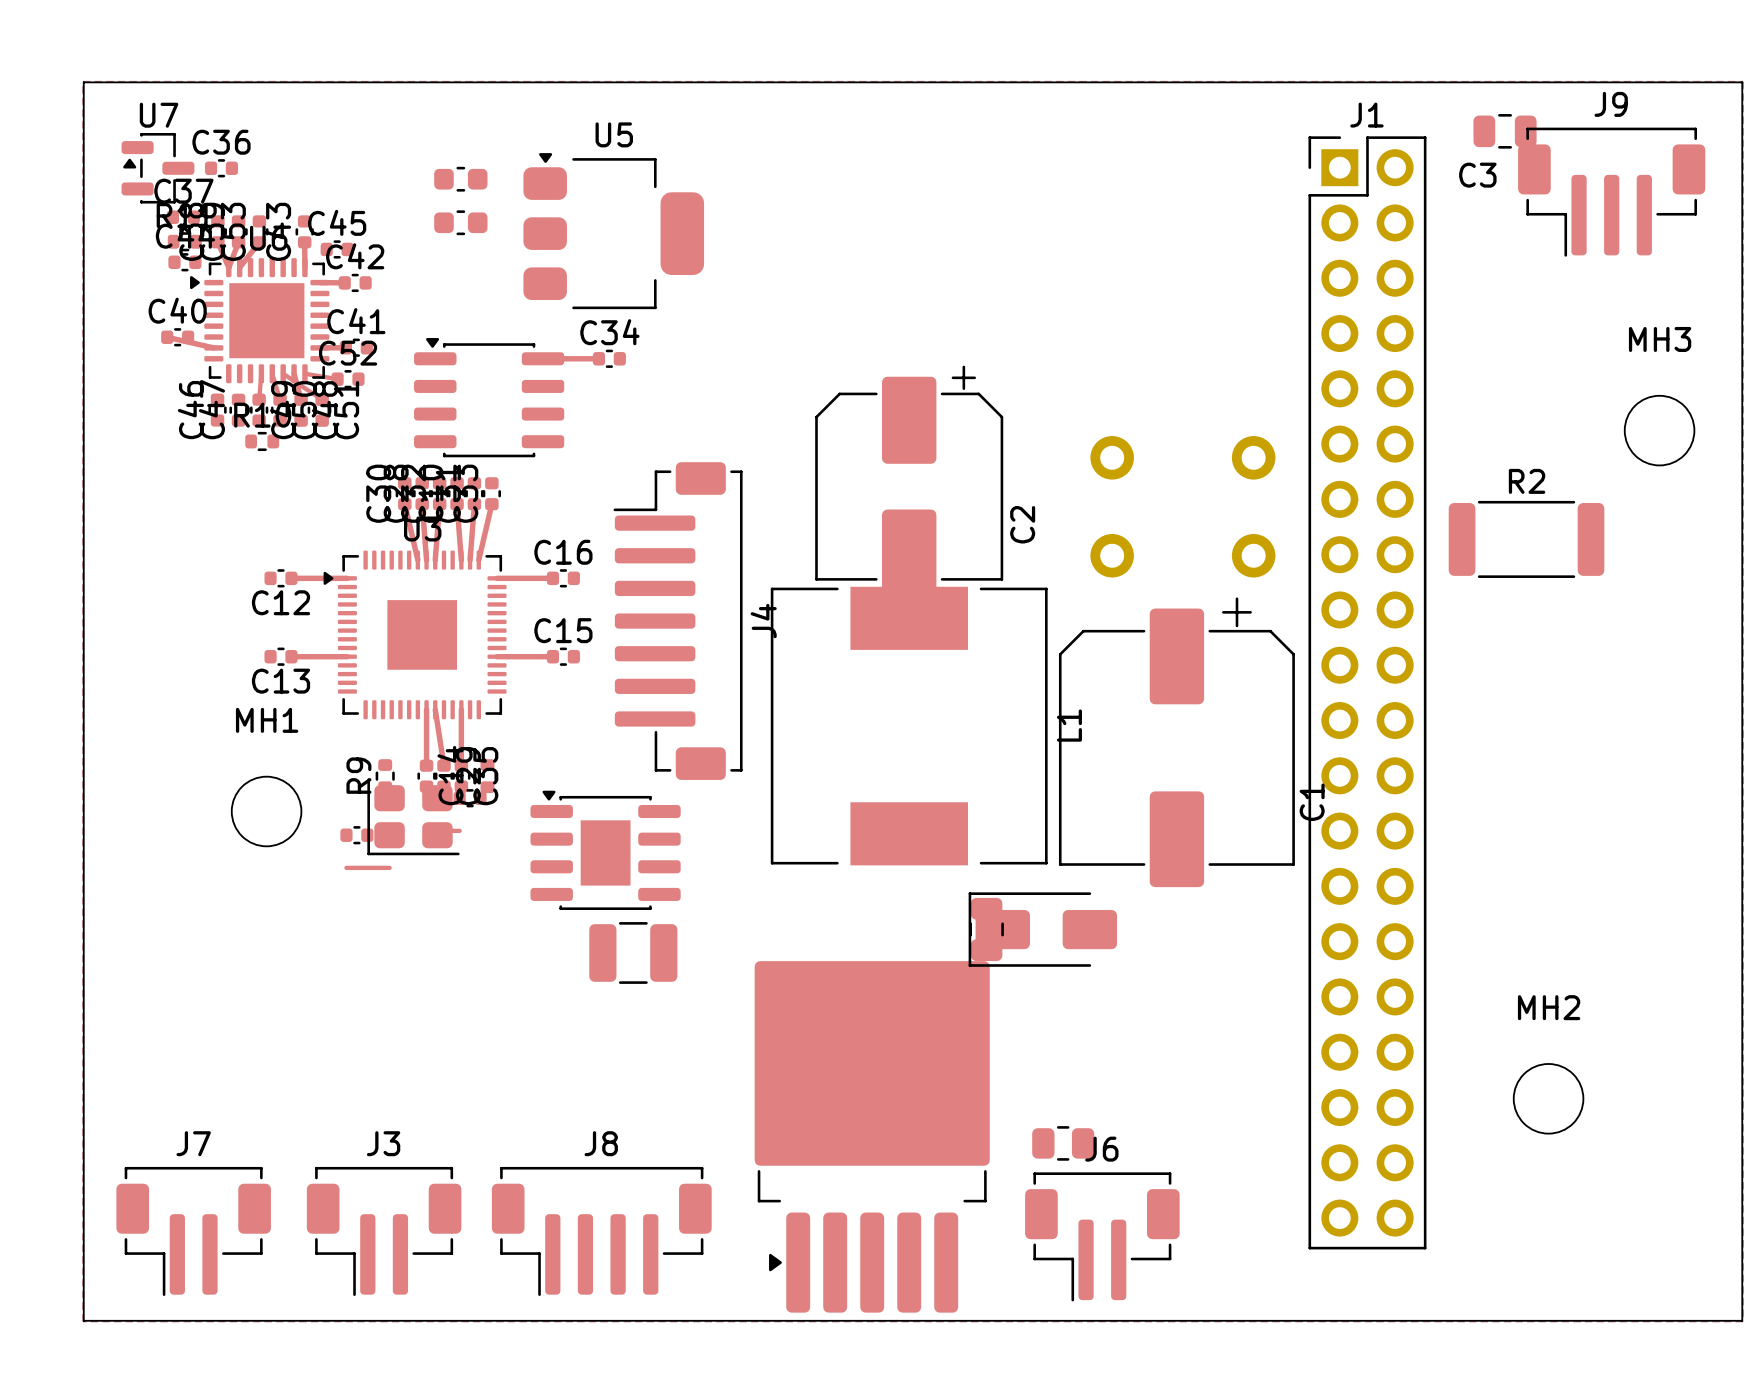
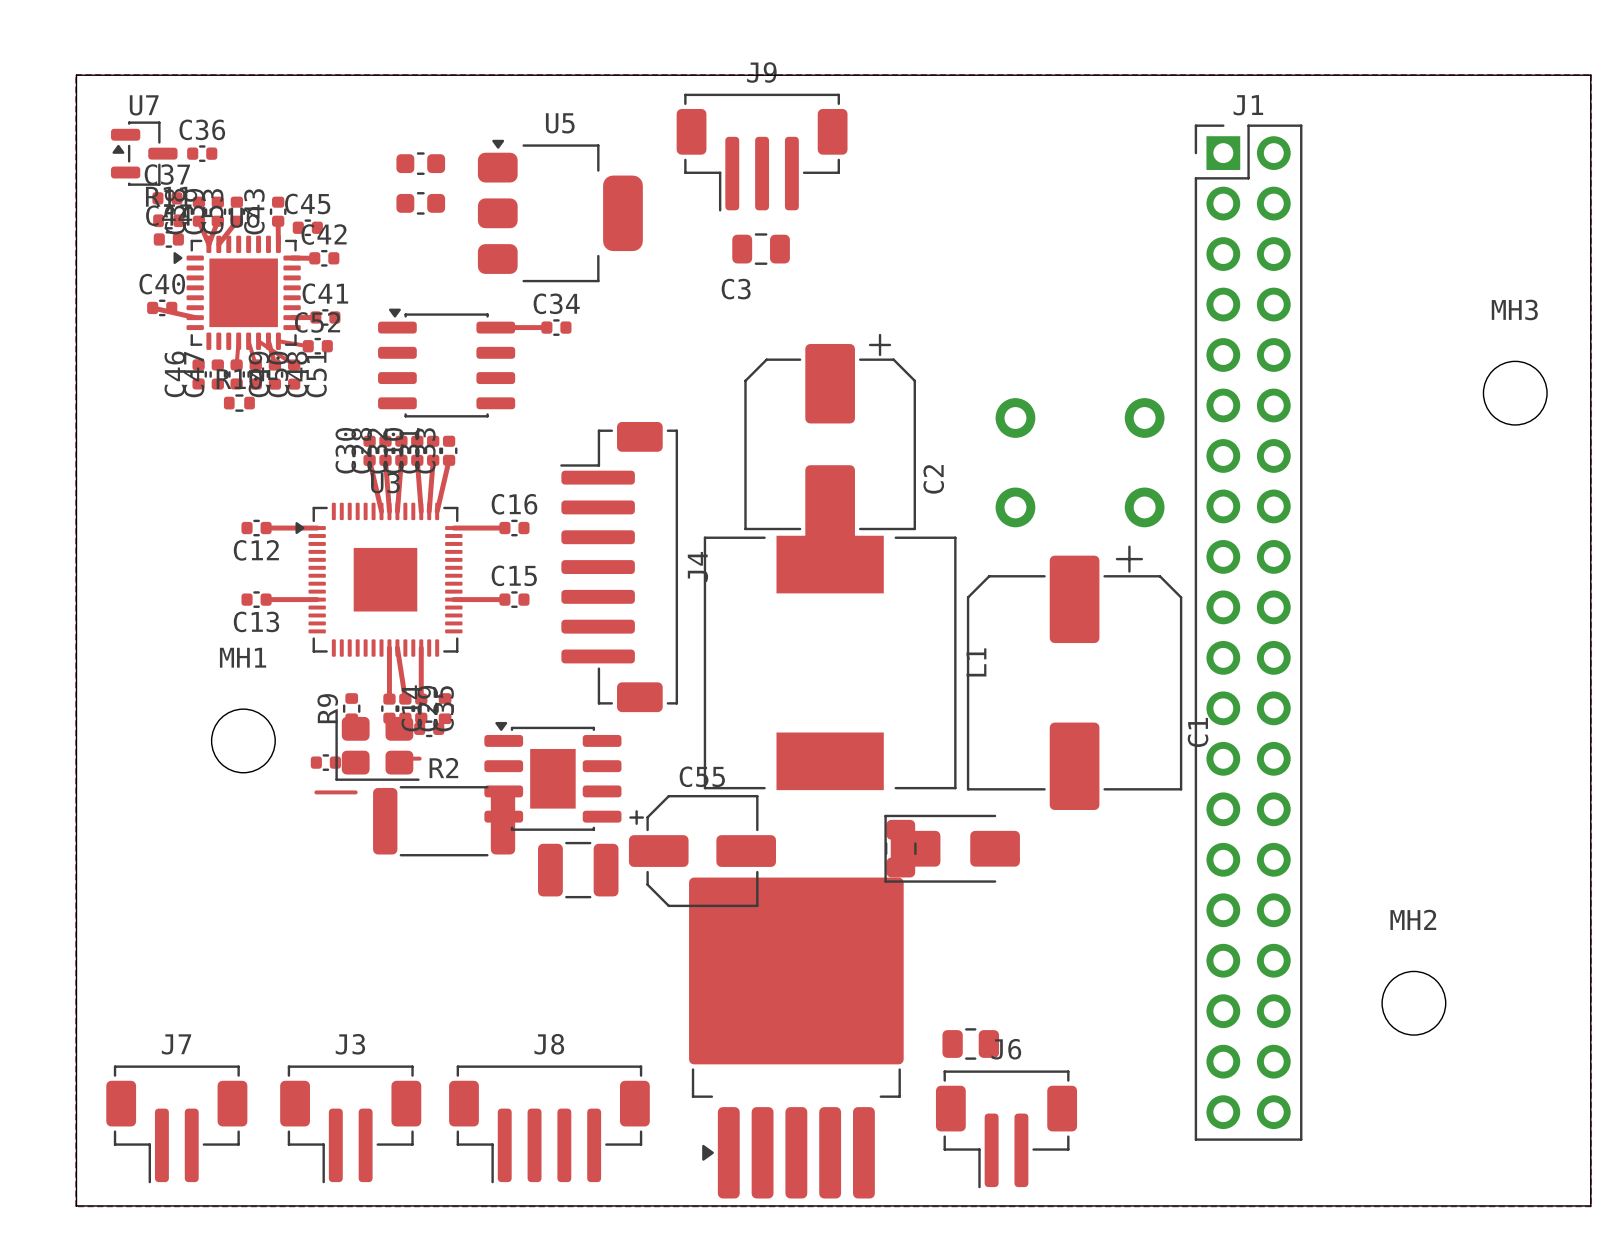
C3 position: (1505, 131) -> (761, 249)
J9 position: (1611, 192) -> (762, 152)
R2 position: (1526, 539) -> (444, 821)
C55: none -> (702, 851)

